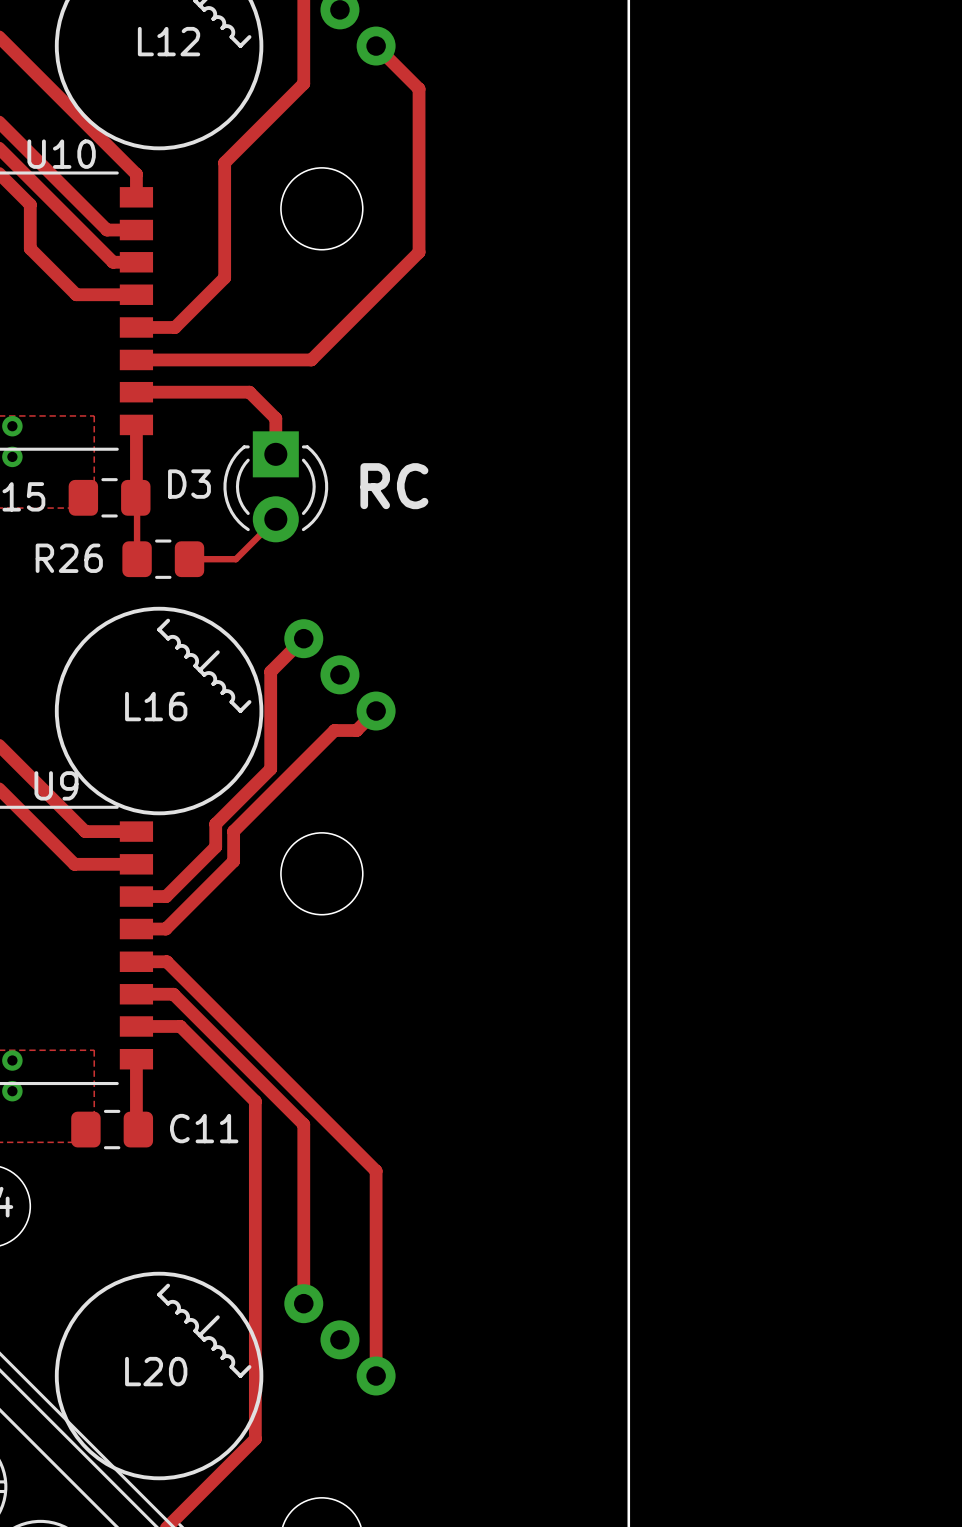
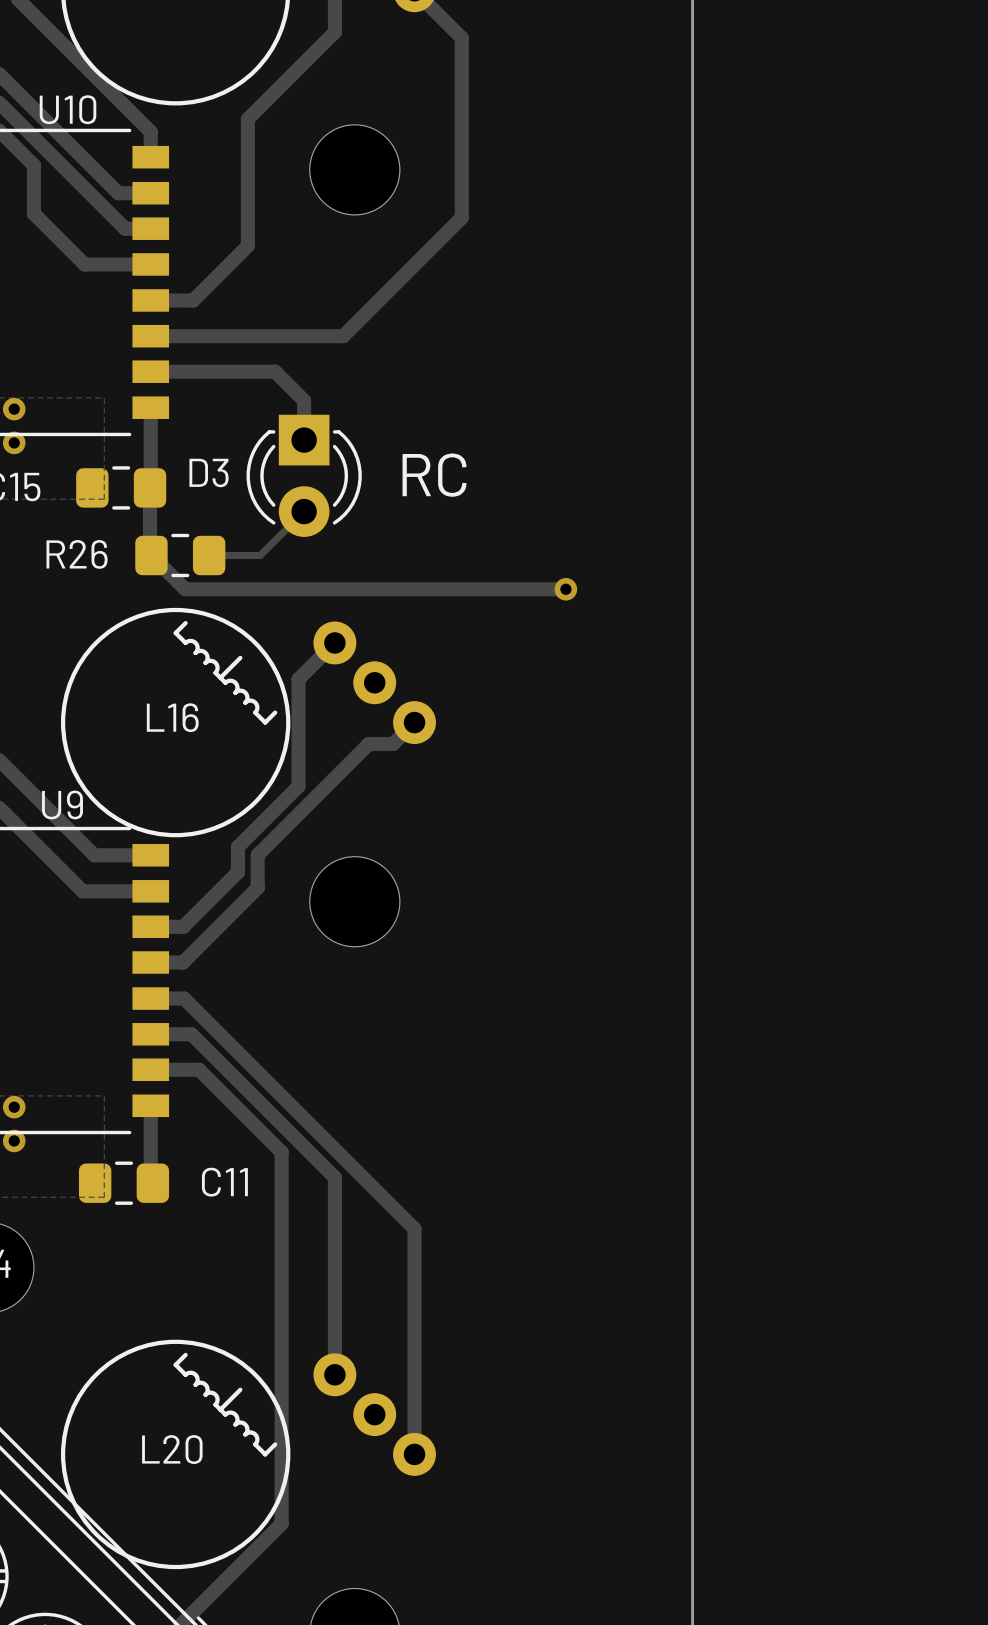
track: (135, 497) (137, 559) -> (150, 487) (150, 554) (185, 589) (565, 589)
via: none -> (565, 589)

